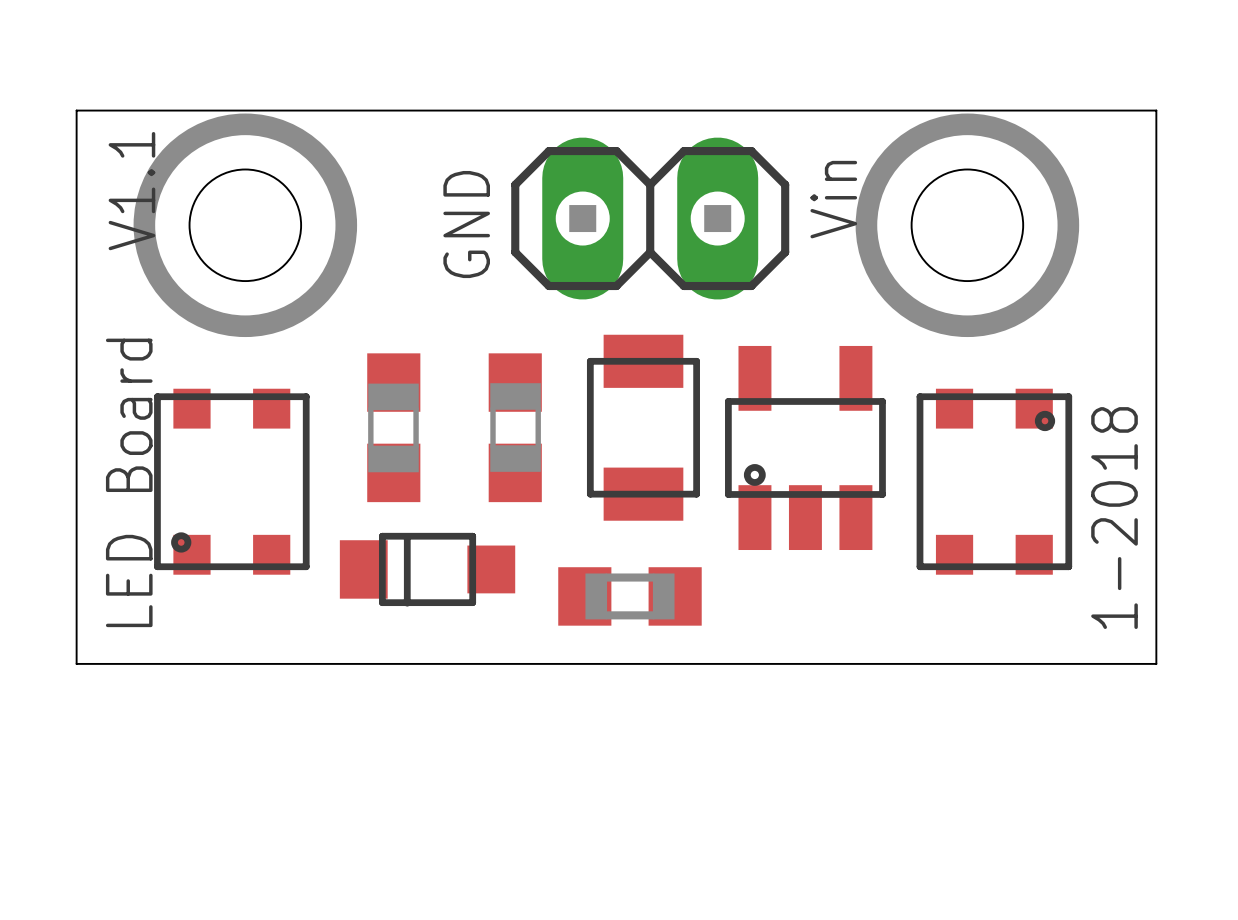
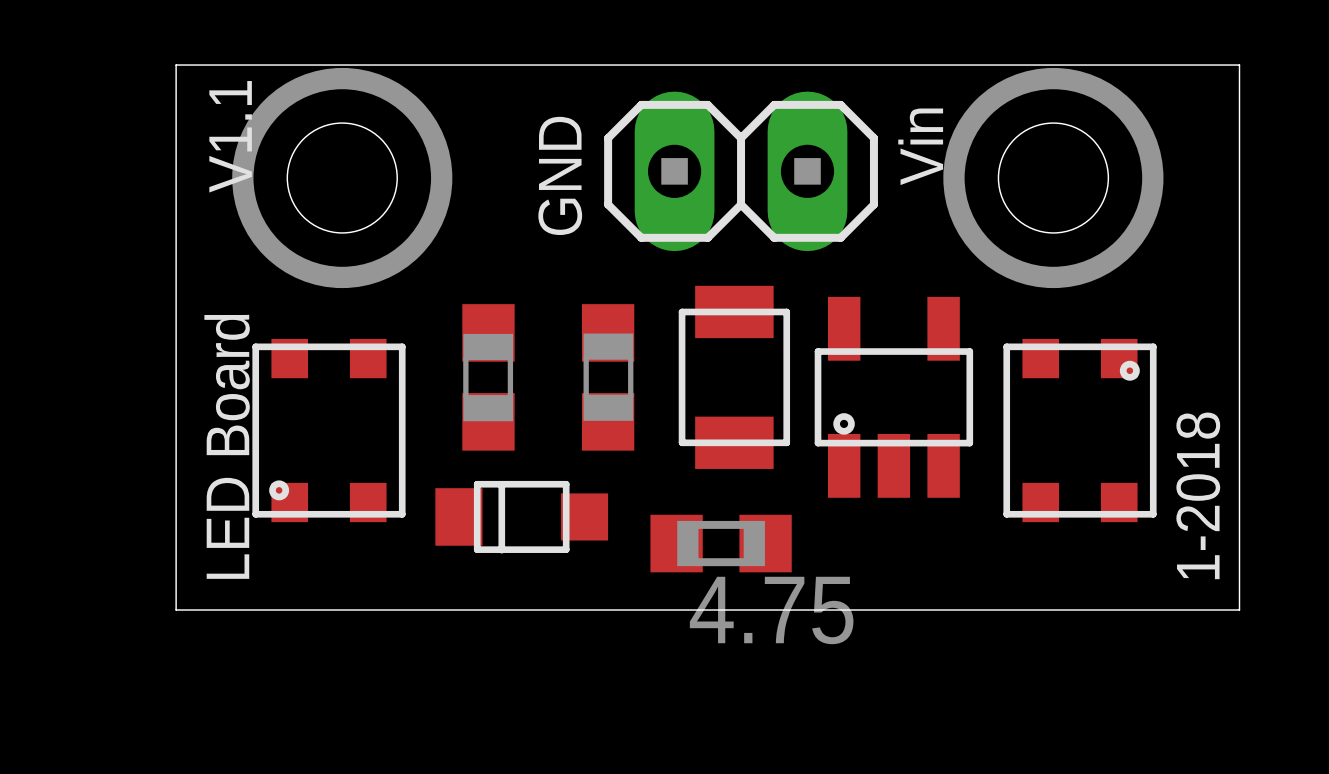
part value: none -> 4.75 (771, 610)

